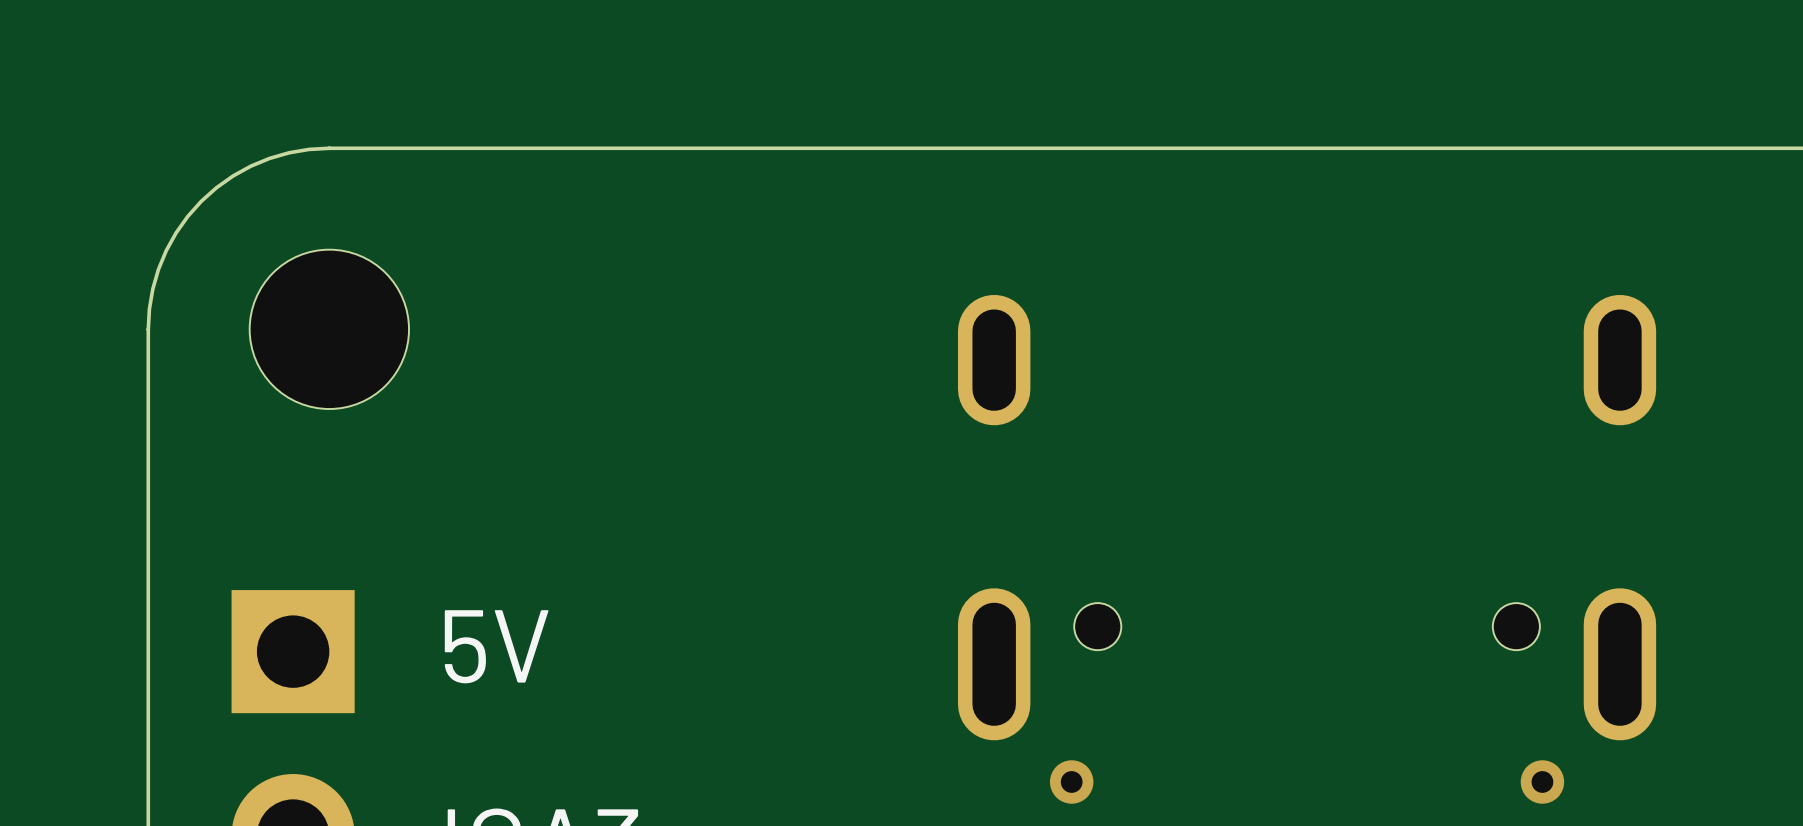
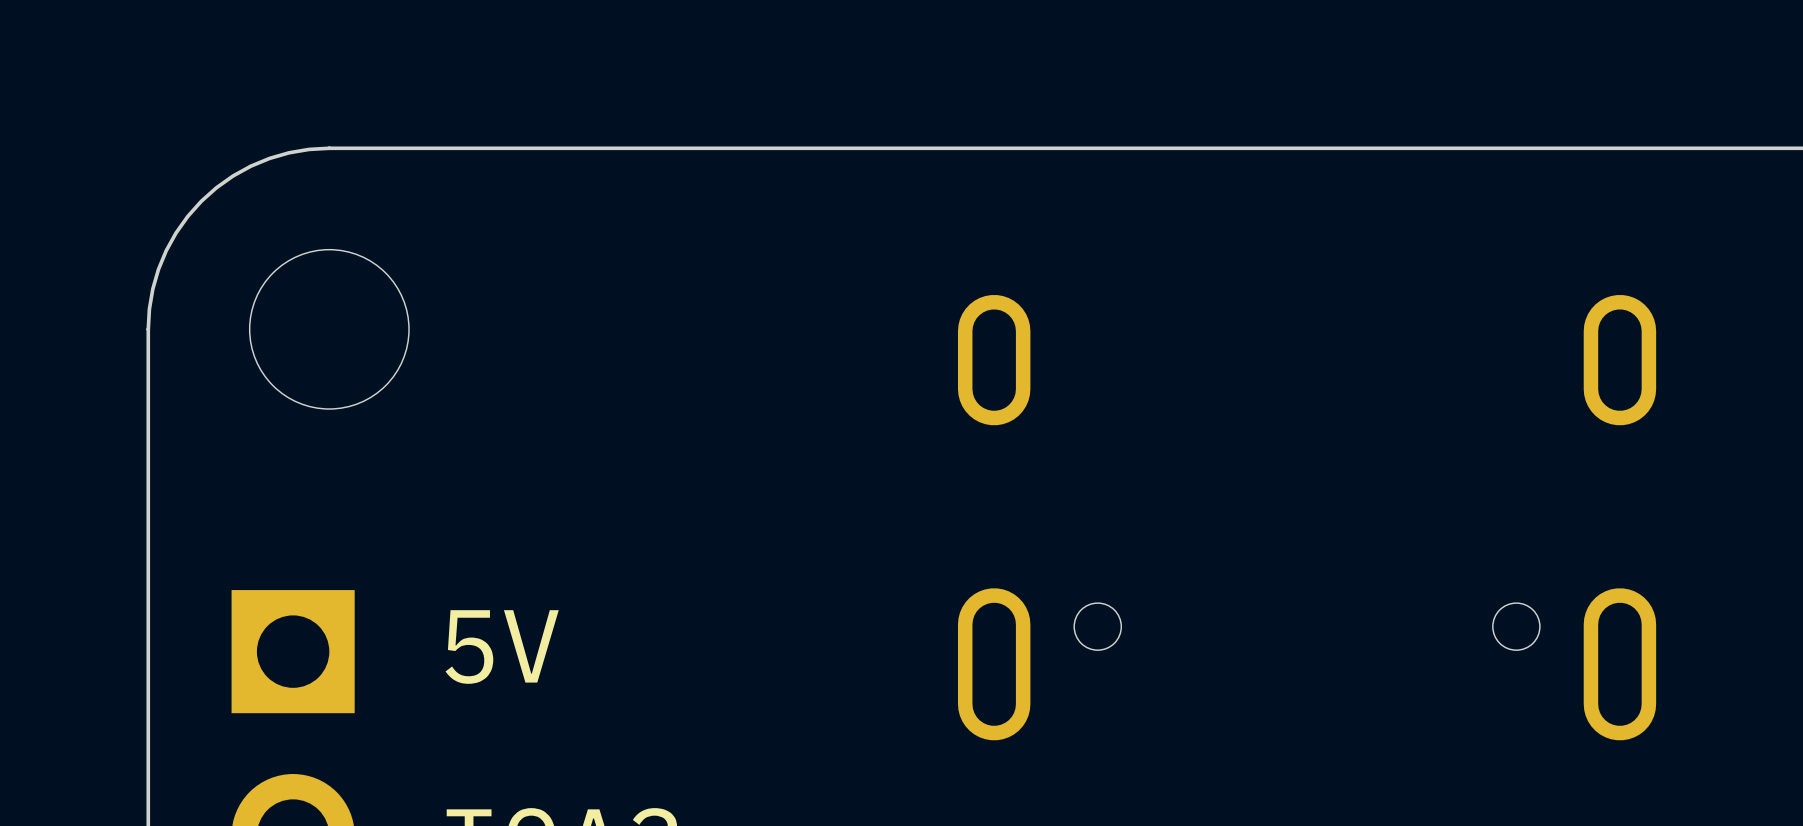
via: (1071, 781) -> none
via: (1542, 781) -> none

